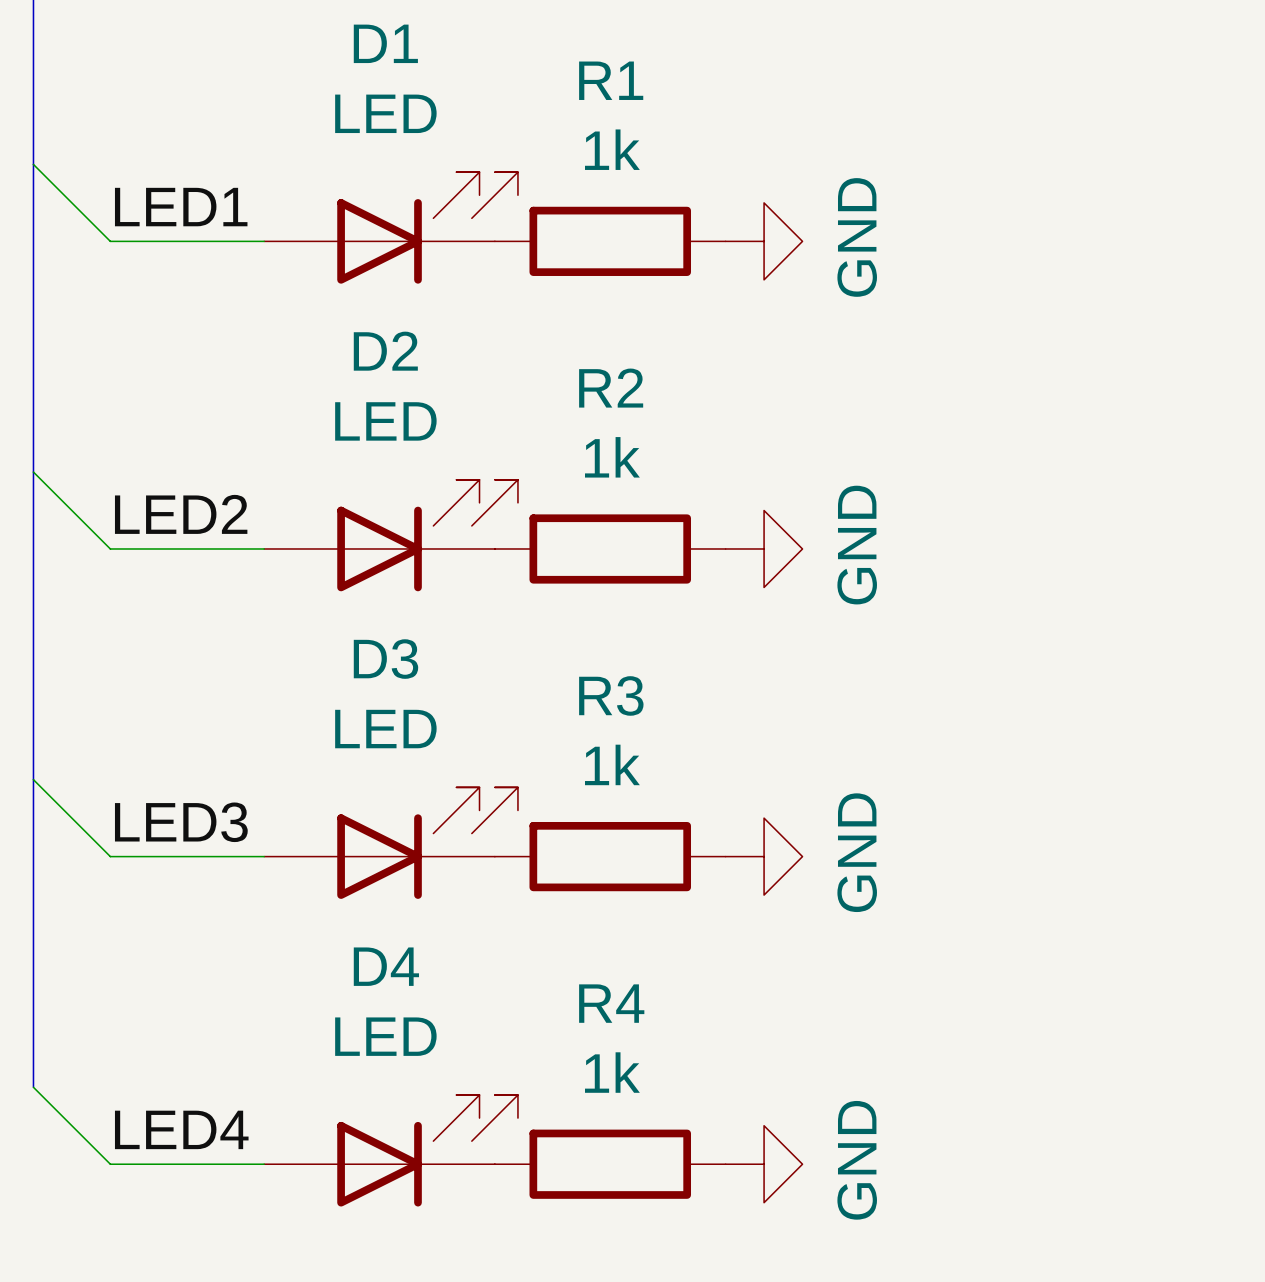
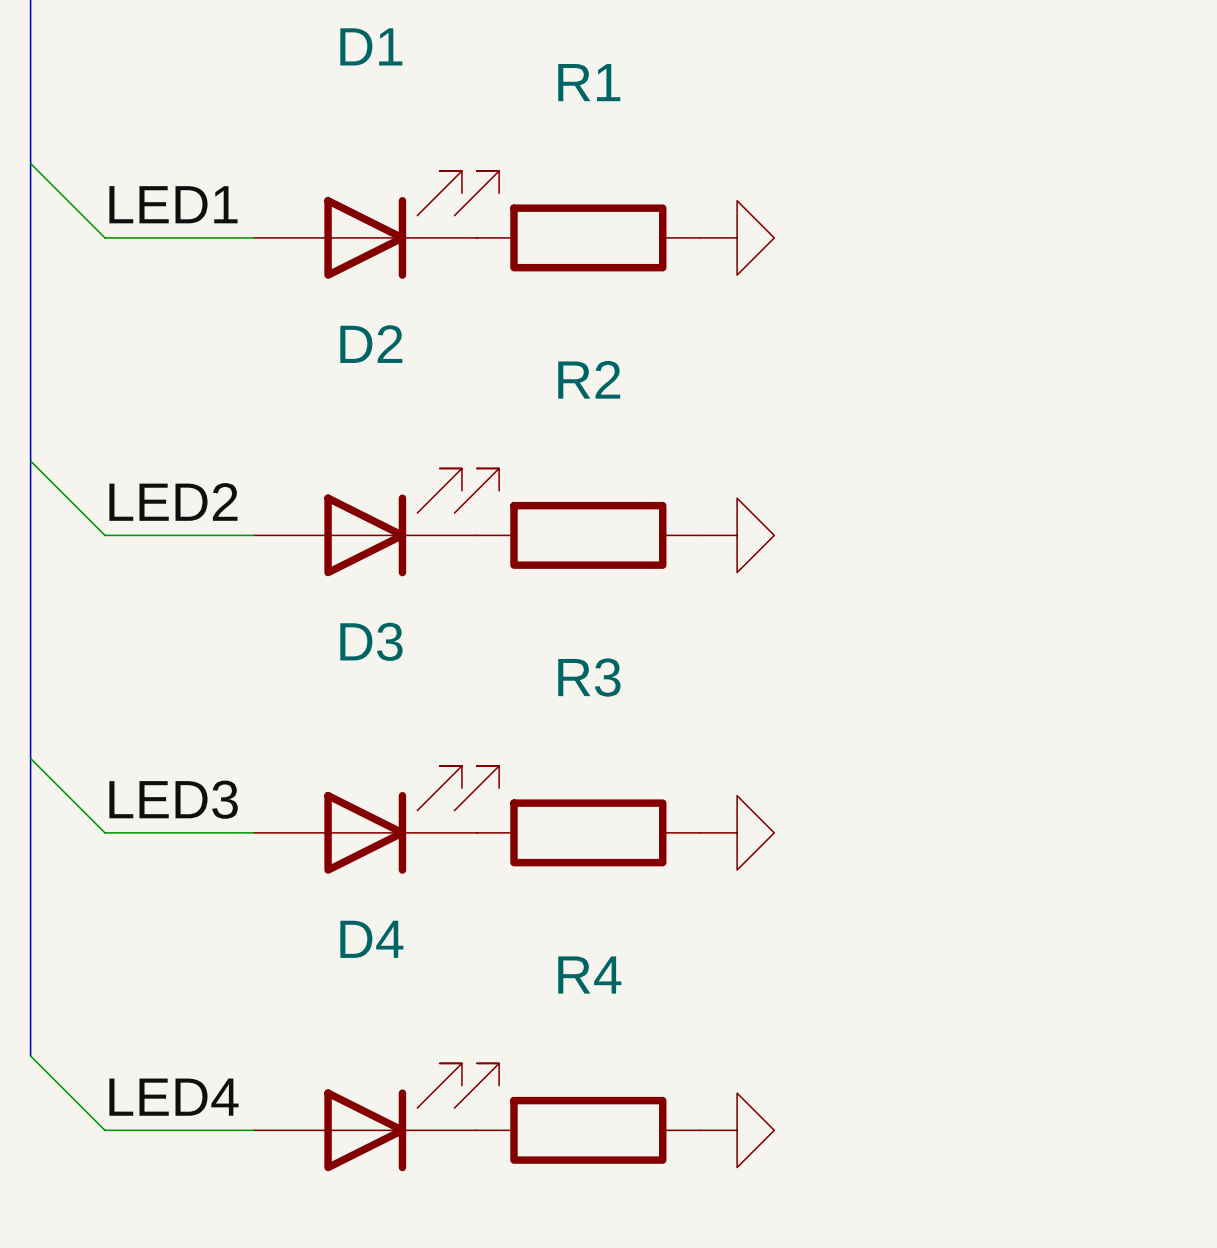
D1 value: LED (385, 113) -> none
R1 value: 1k (612, 149) -> none
power symbol text: GND (857, 237) -> none
D2 value: LED (385, 421) -> none
R2 value: 1k (612, 457) -> none
power symbol text: GND (857, 545) -> none
D3 value: LED (385, 729) -> none
R3 value: 1k (612, 764) -> none
power symbol text: GND (857, 852) -> none
D4 value: LED (385, 1036) -> none
R4 value: 1k (612, 1072) -> none
power symbol text: GND (857, 1160) -> none

